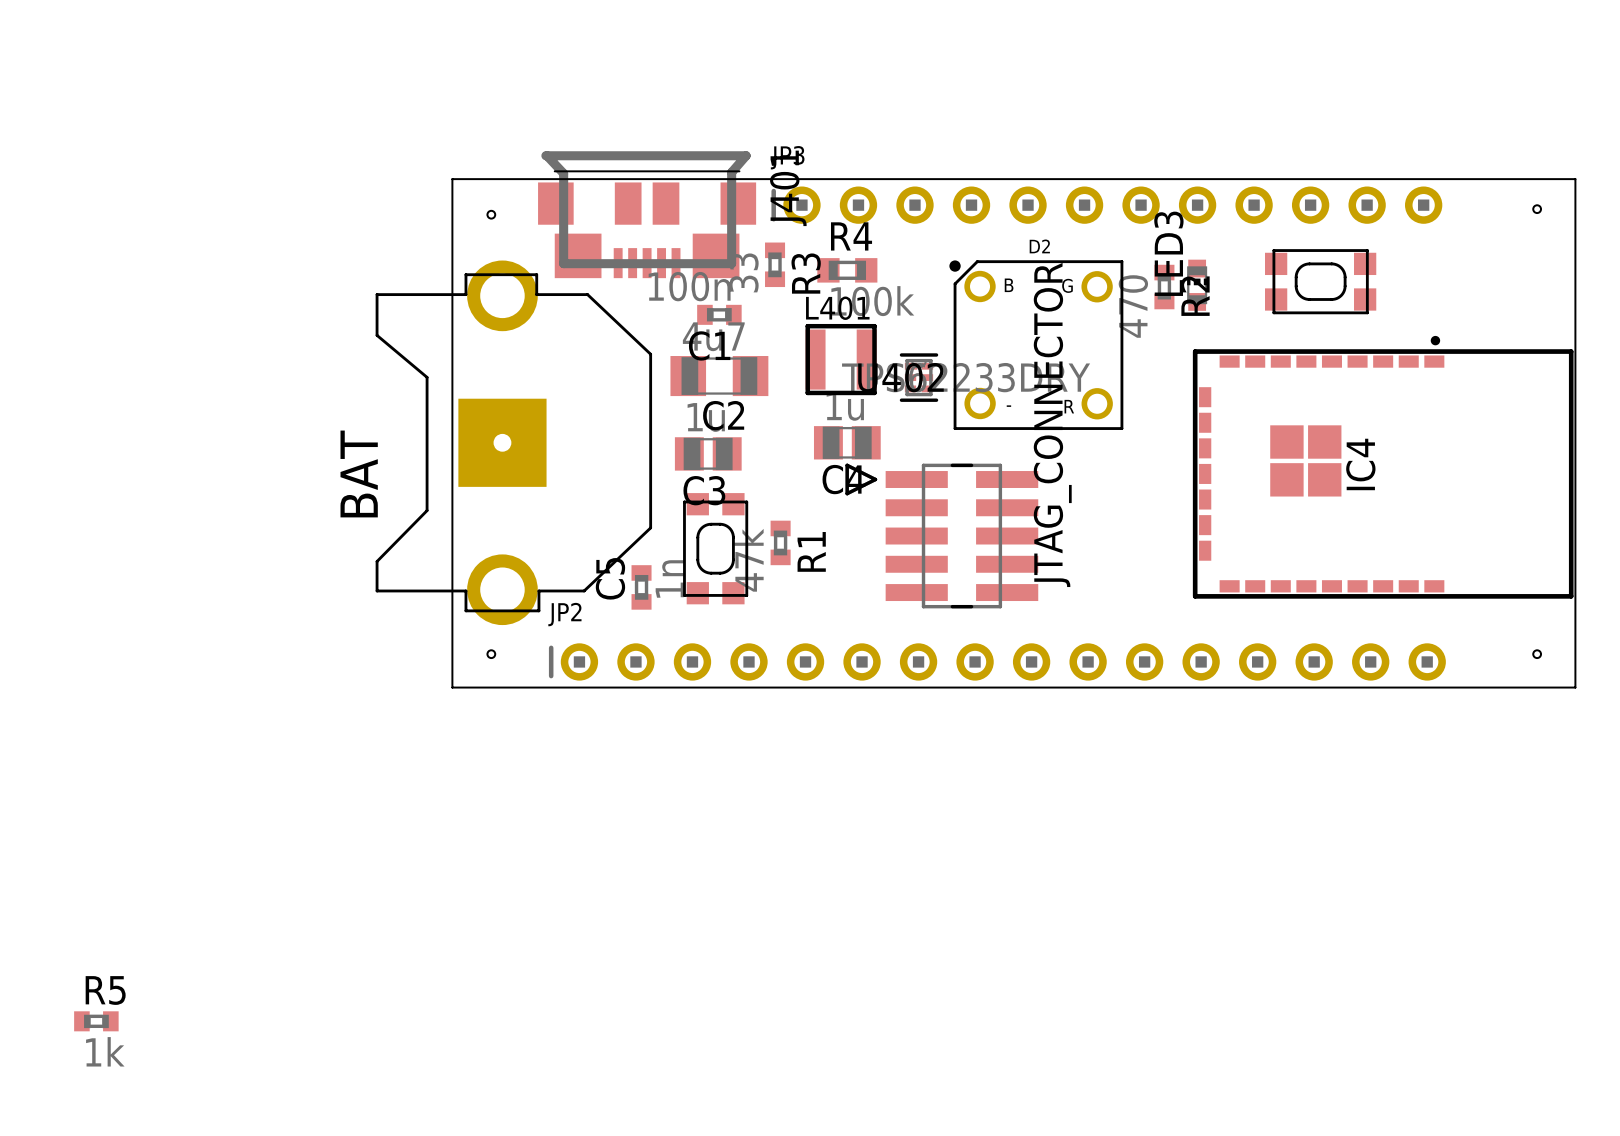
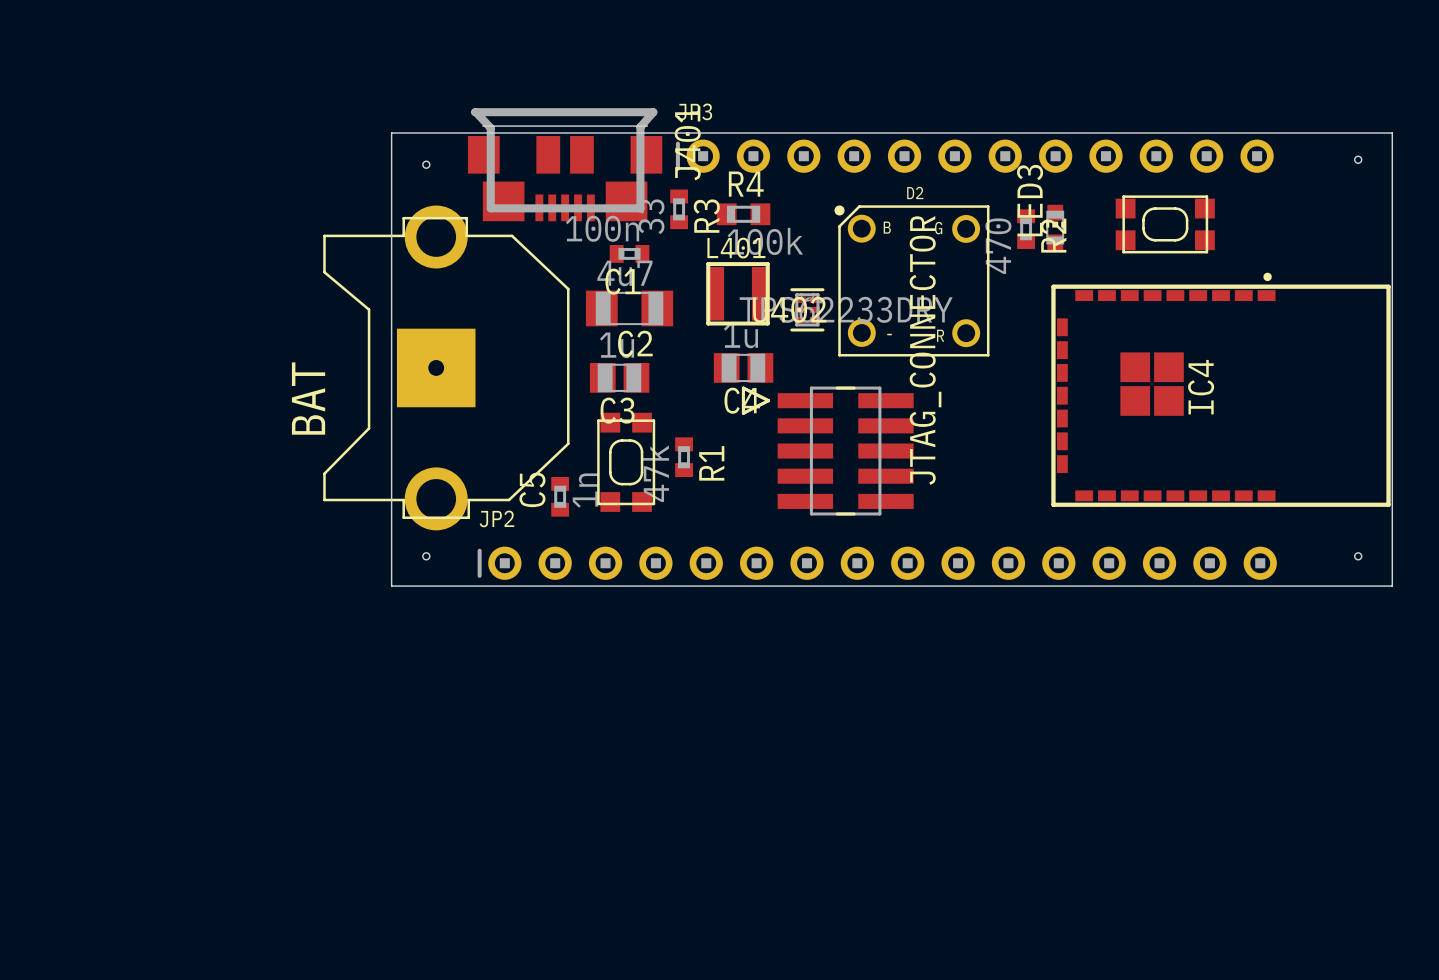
R5: 1k (96, 1021) -> none

